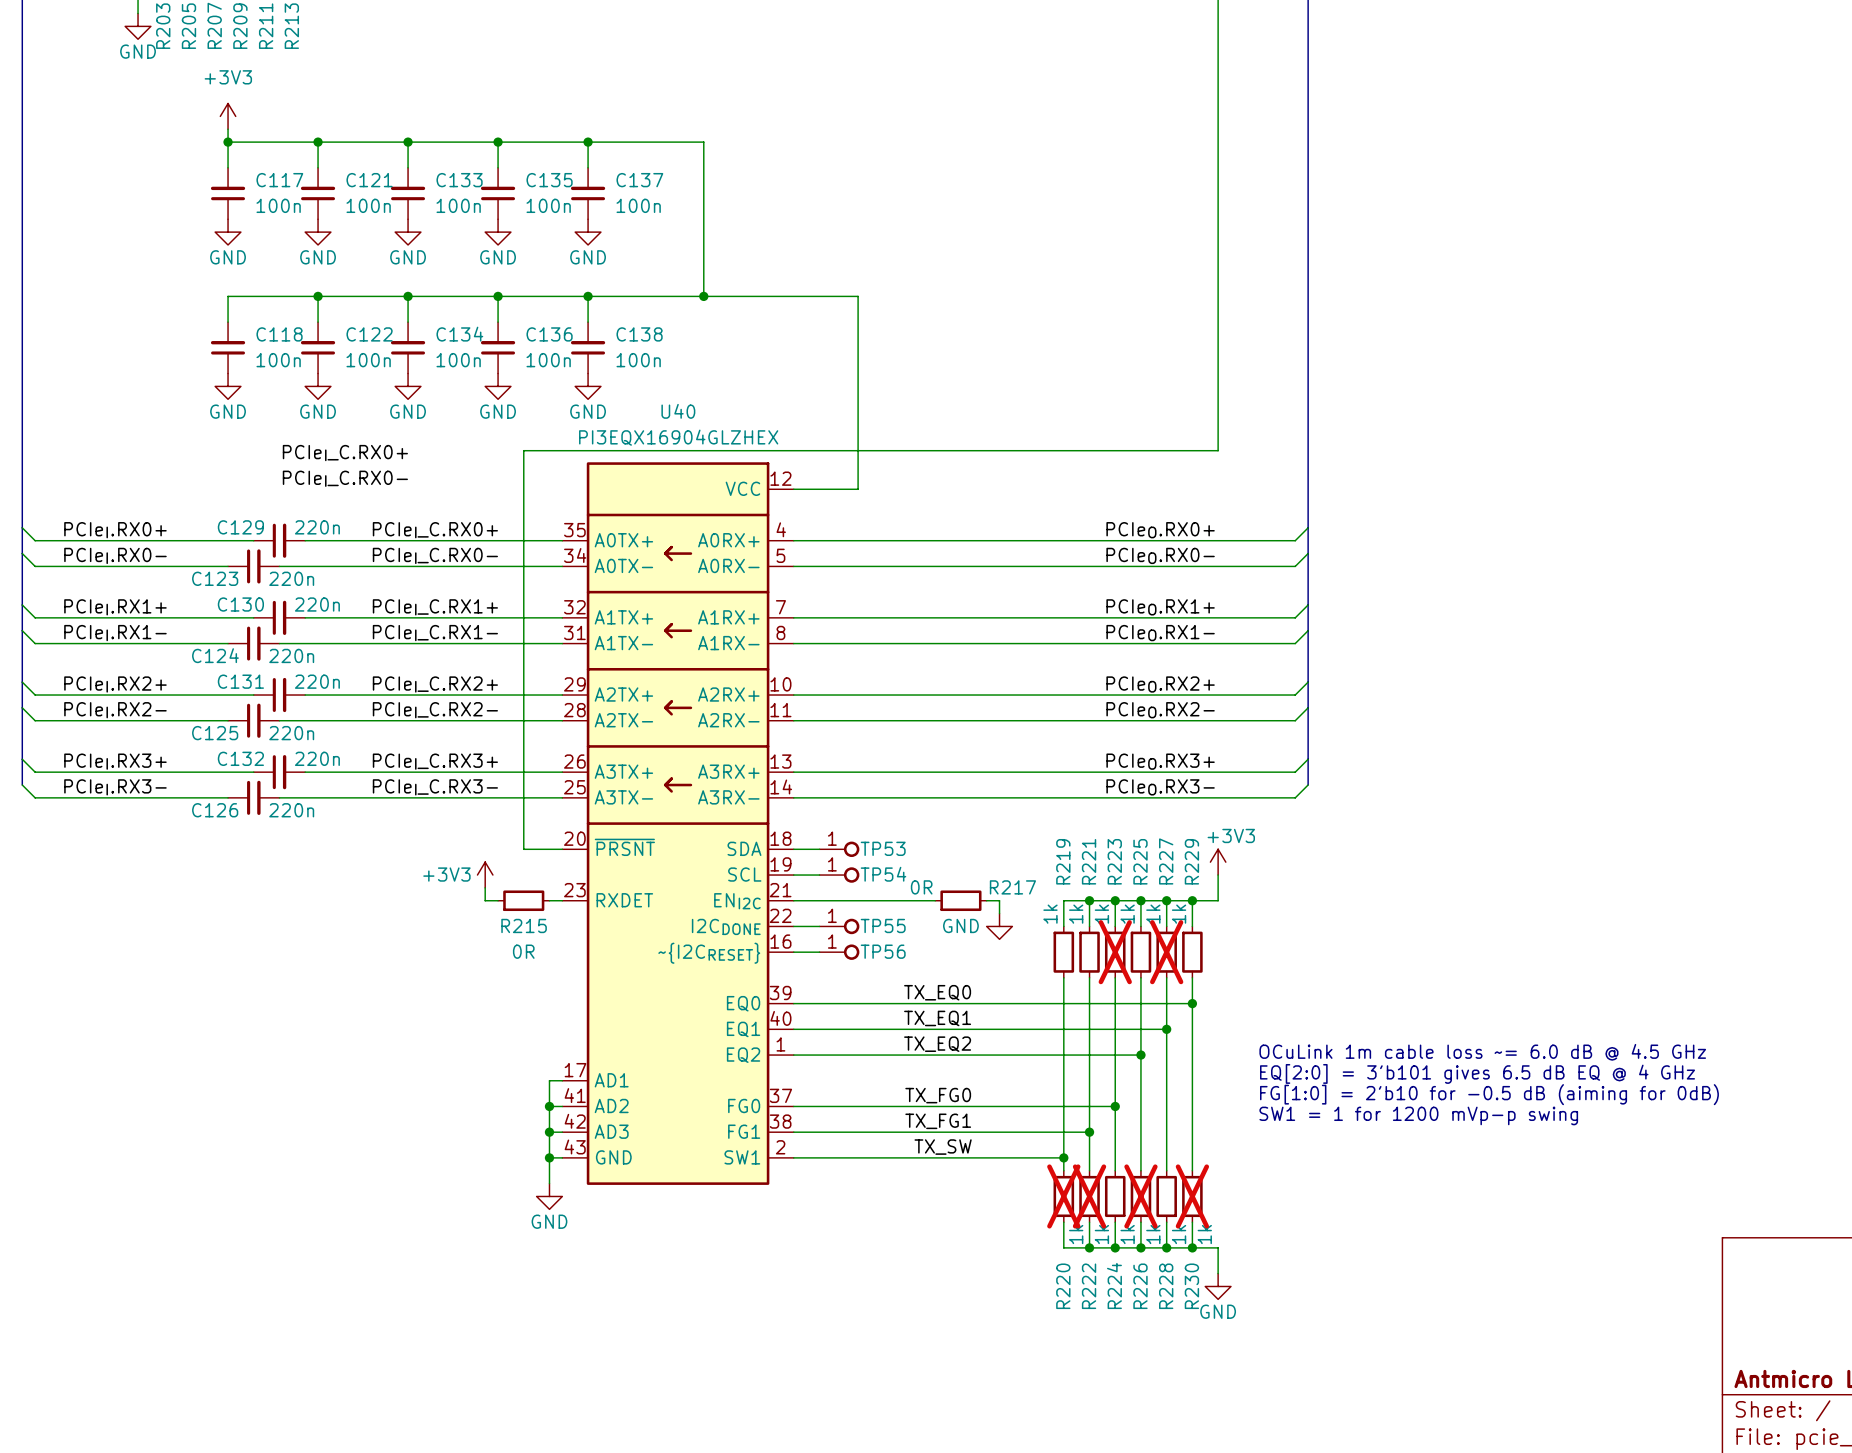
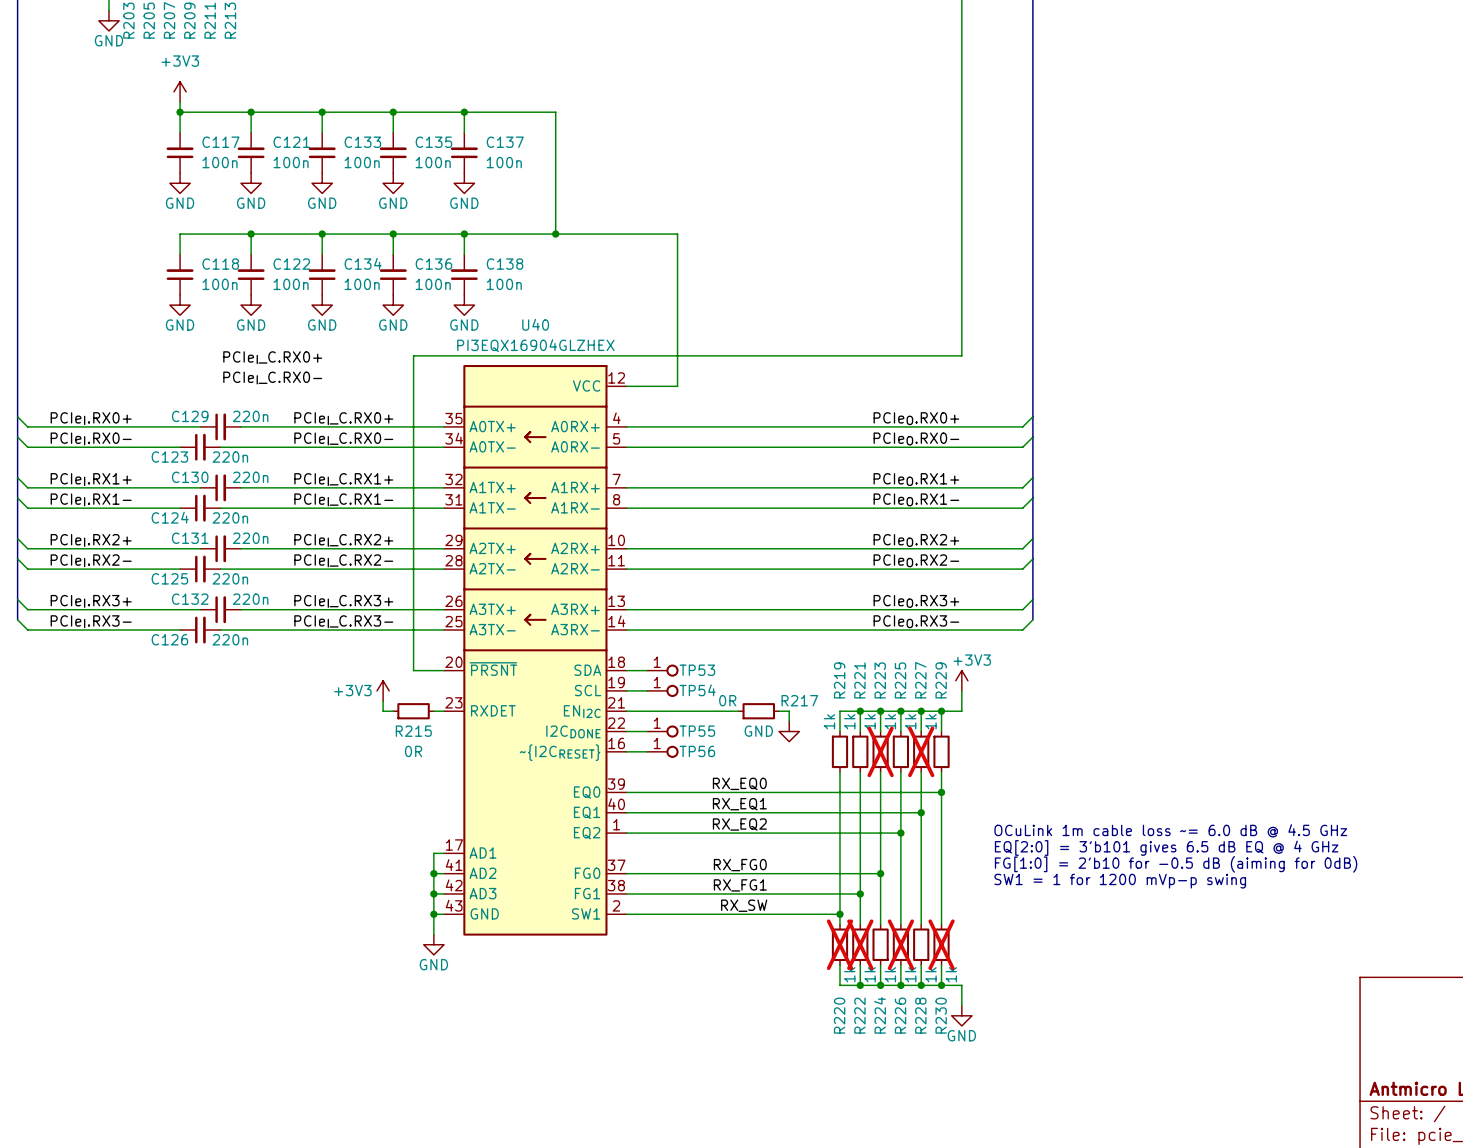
label: TX_EQ0 (937, 992) -> RX_EQ0 (739, 783)
label: TX_EQ1 (937, 1018) -> RX_EQ1 (739, 804)
label: TX_EQ2 (937, 1044) -> RX_EQ2 (739, 824)
label: TX_FG0 (938, 1095) -> RX_FG0 (740, 865)
label: TX_FG1 (938, 1121) -> RX_FG1 (740, 885)
label: TX_SW (943, 1147) -> RX_SW (744, 905)

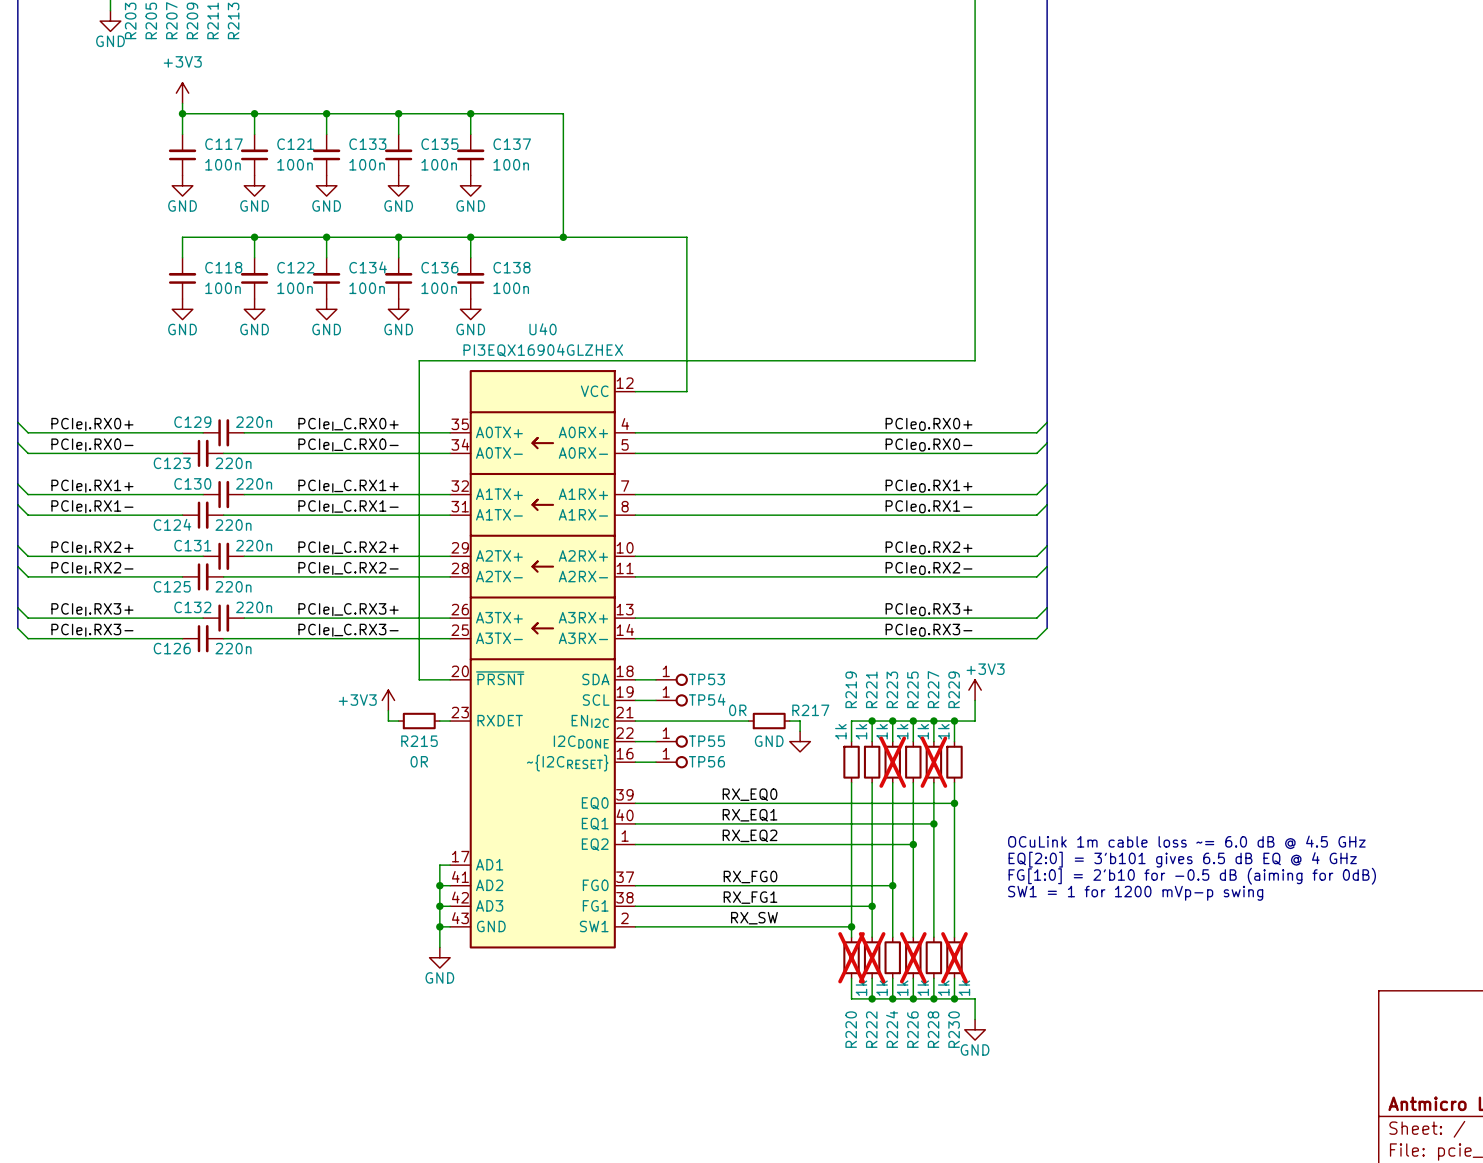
label: PCIeI_C.RX0+ (272, 357) -> none
label: PCIeI_C.RX0- (272, 378) -> none

